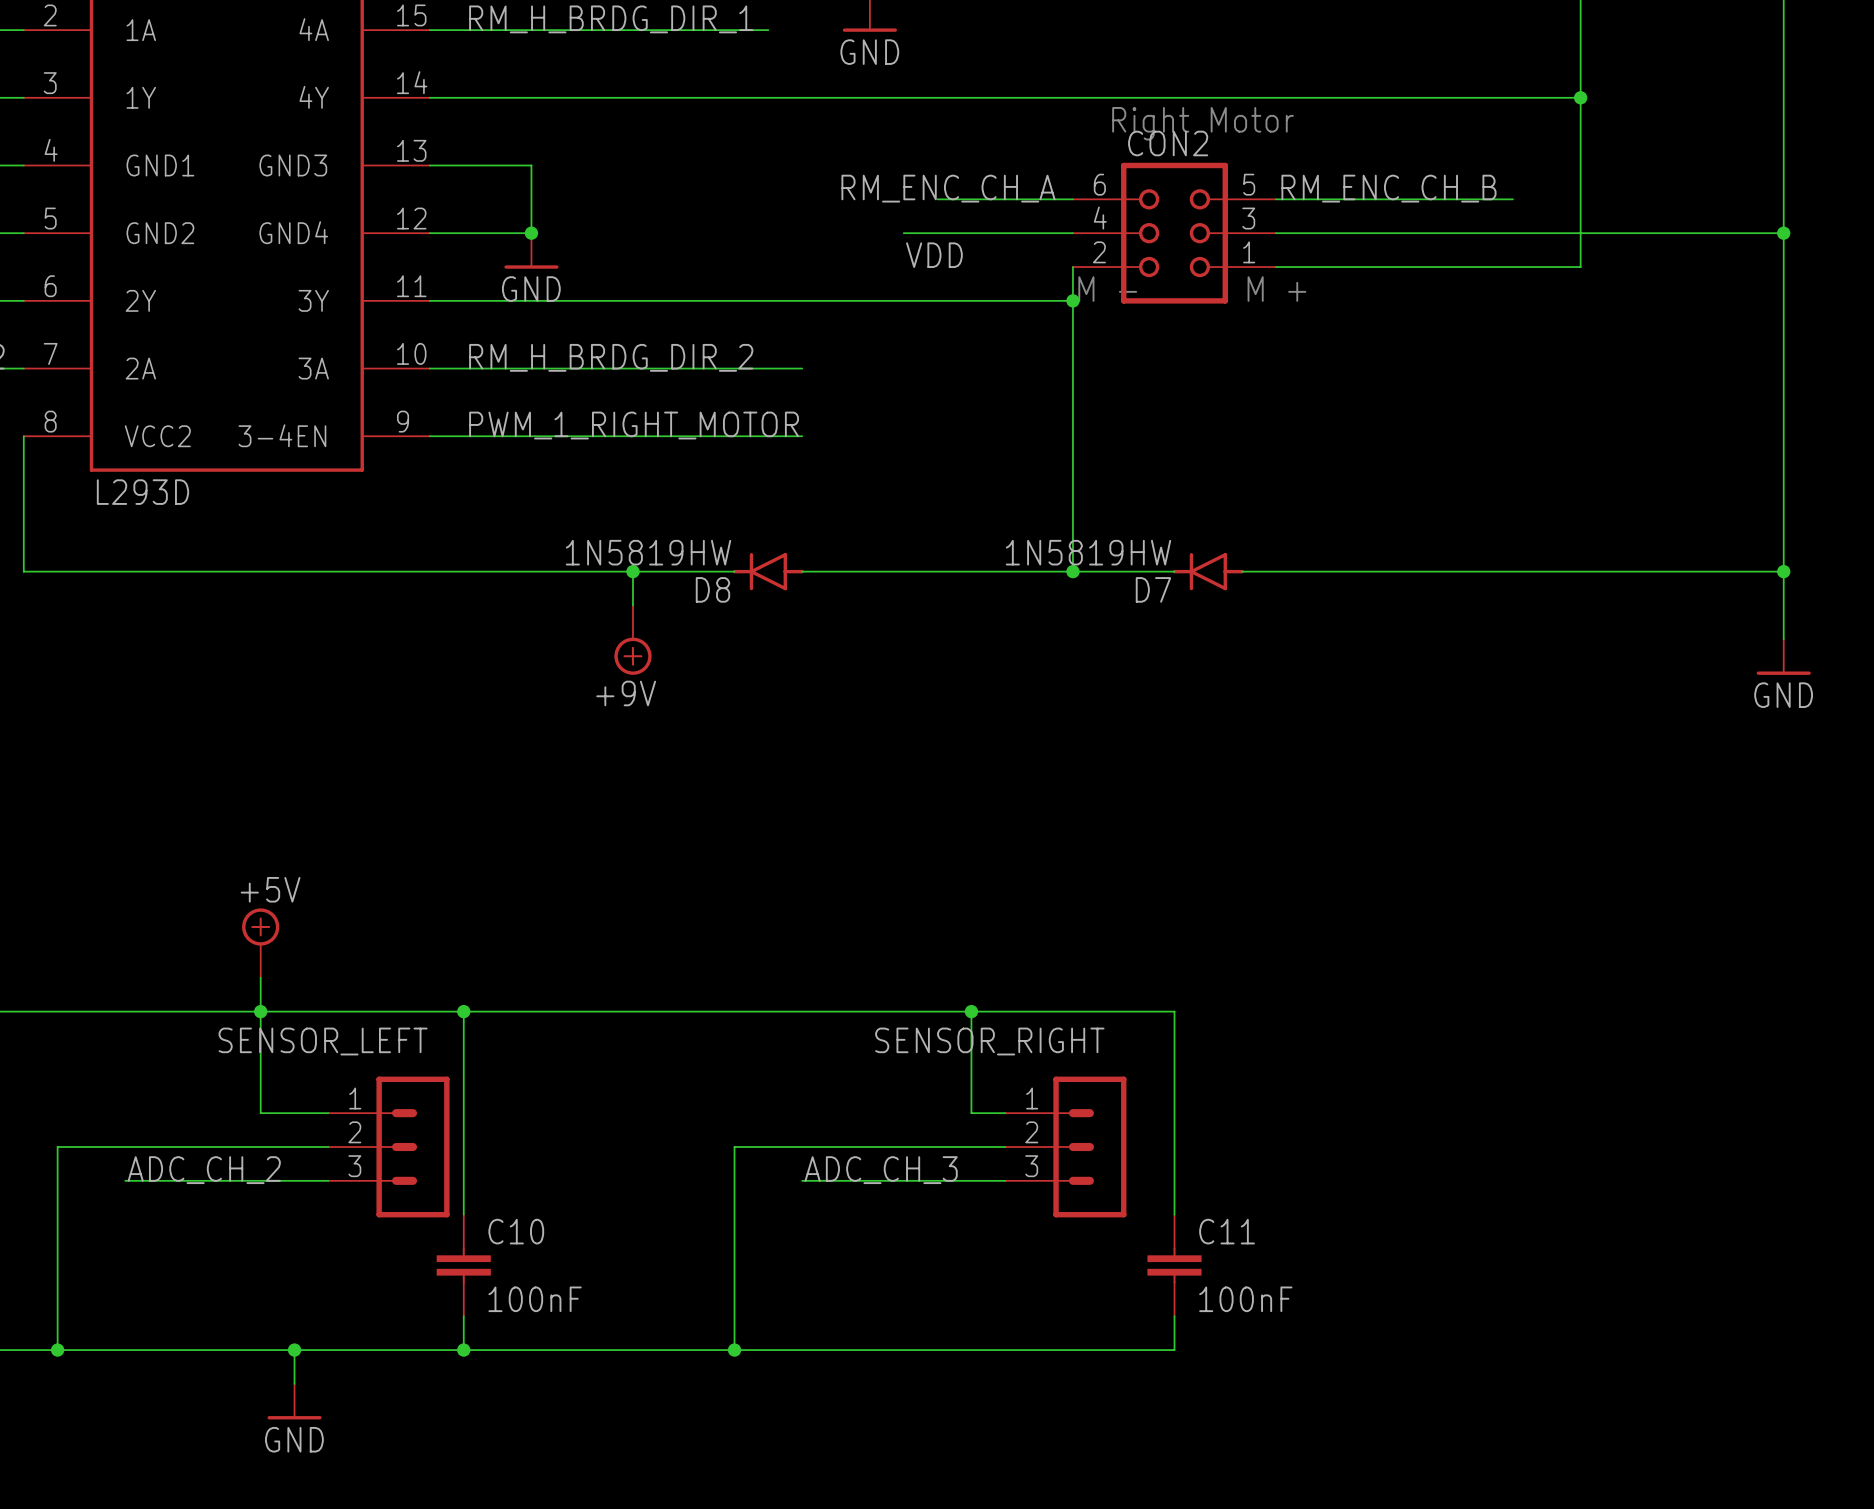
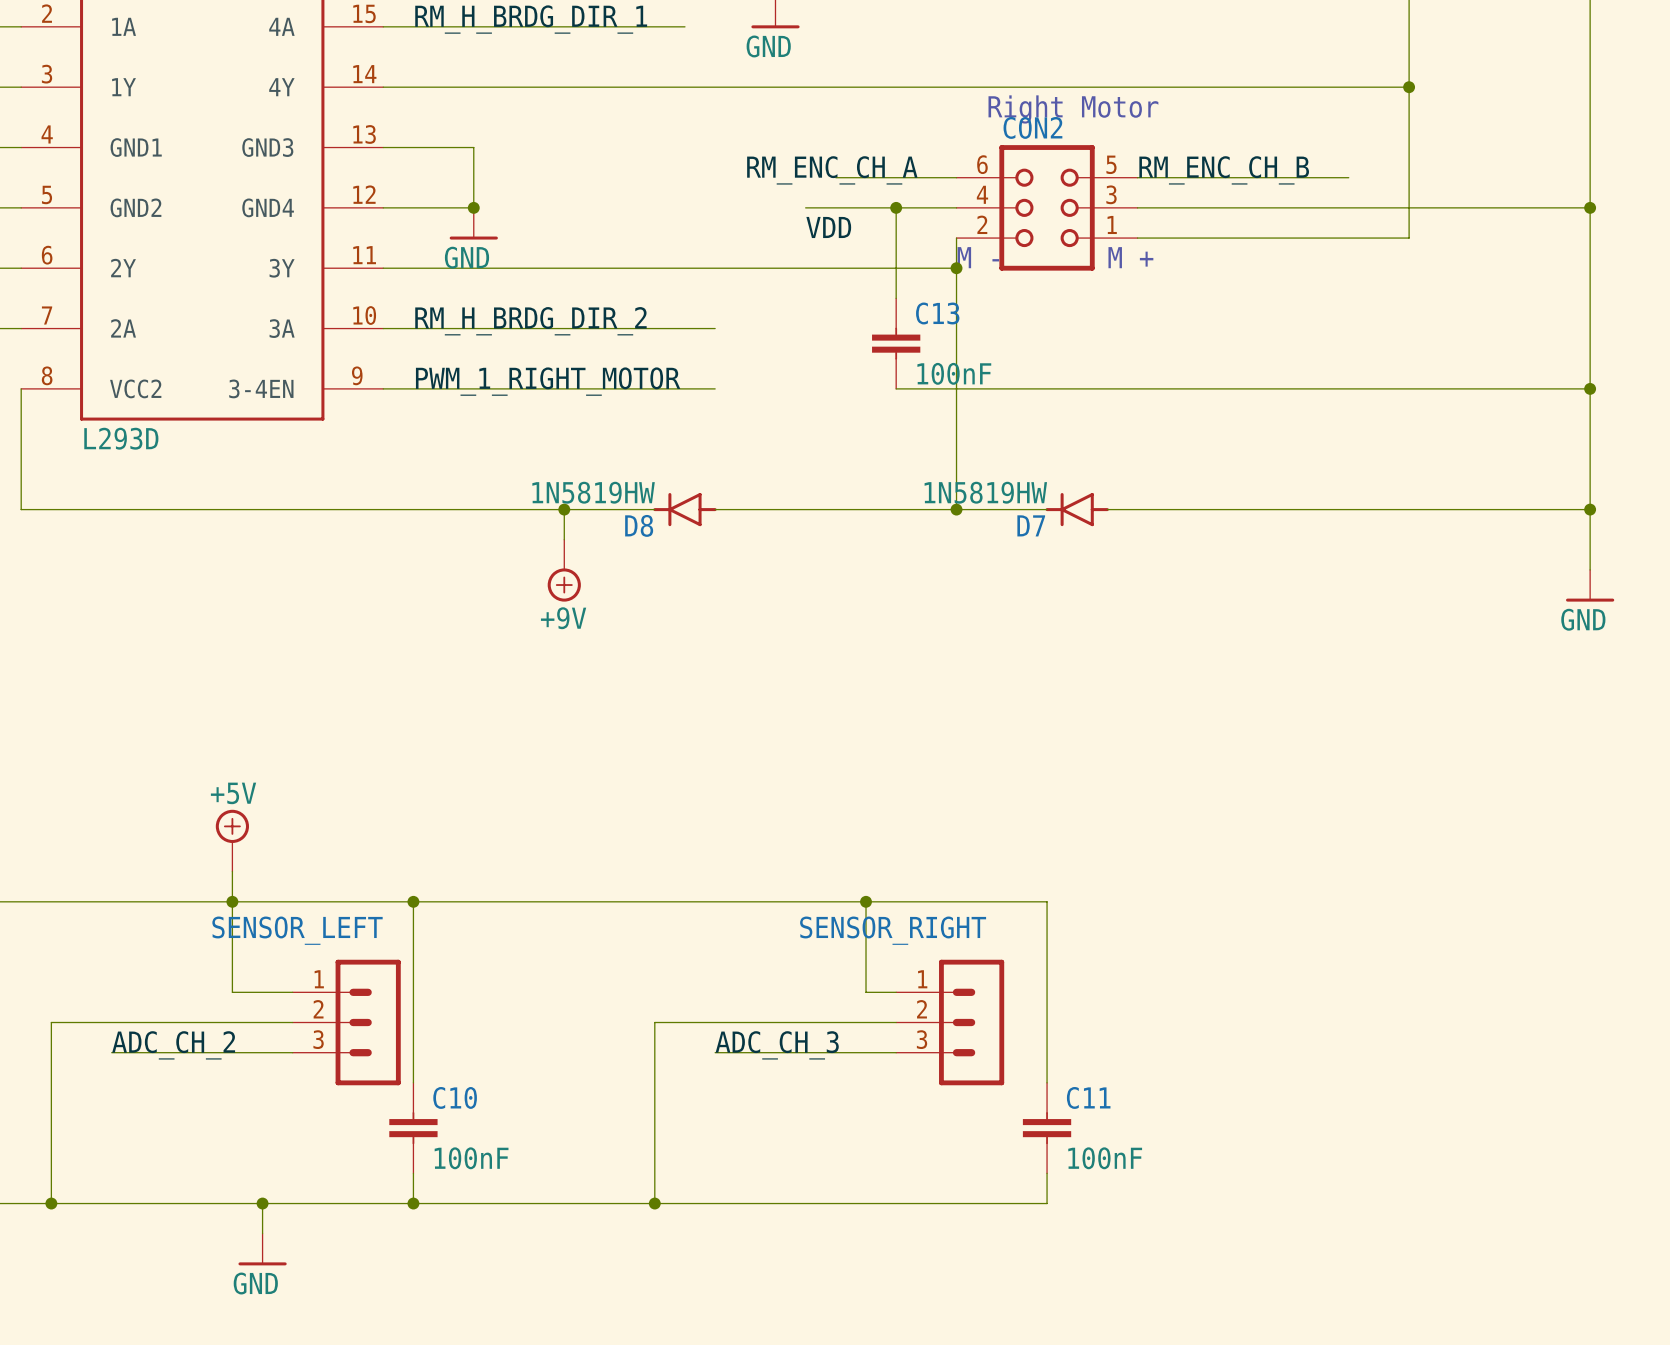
wire: none -> (896, 207) (896, 298)
junction: none -> (896, 207)
C13: none -> 100nF (896, 343)
wire: none -> (896, 388) (1590, 388)
junction: none -> (1590, 388)

